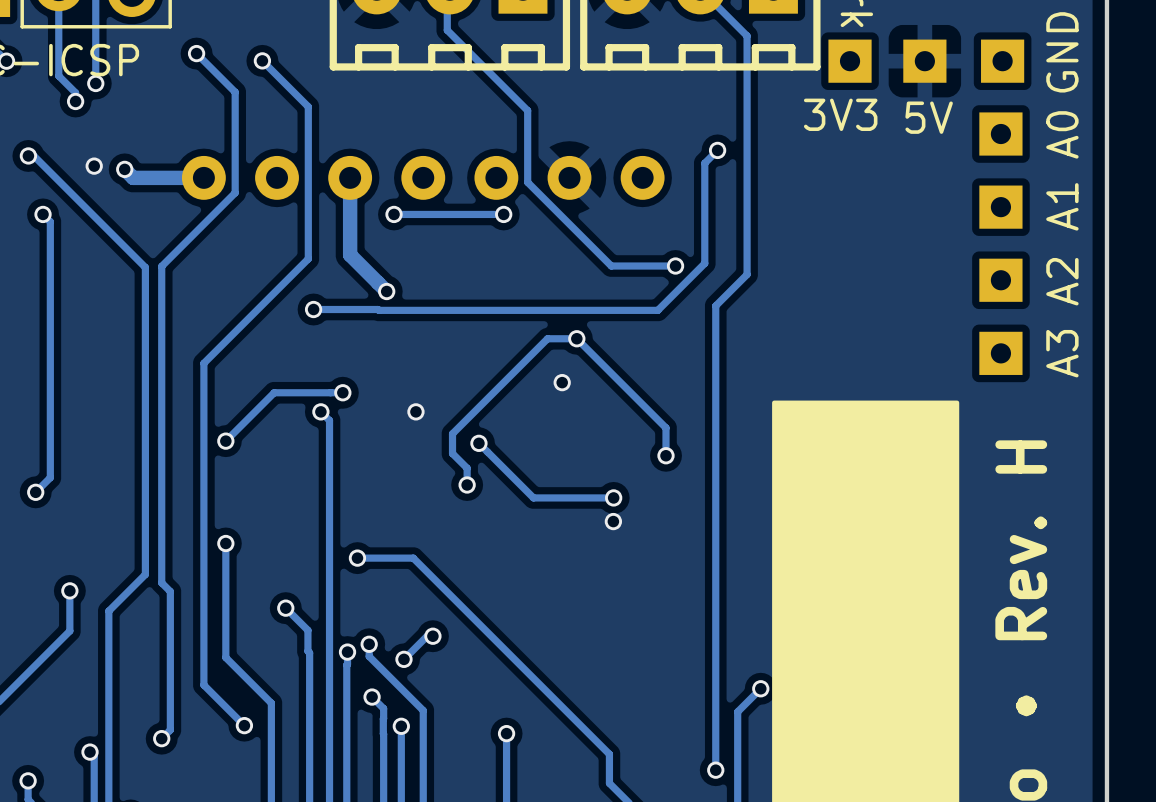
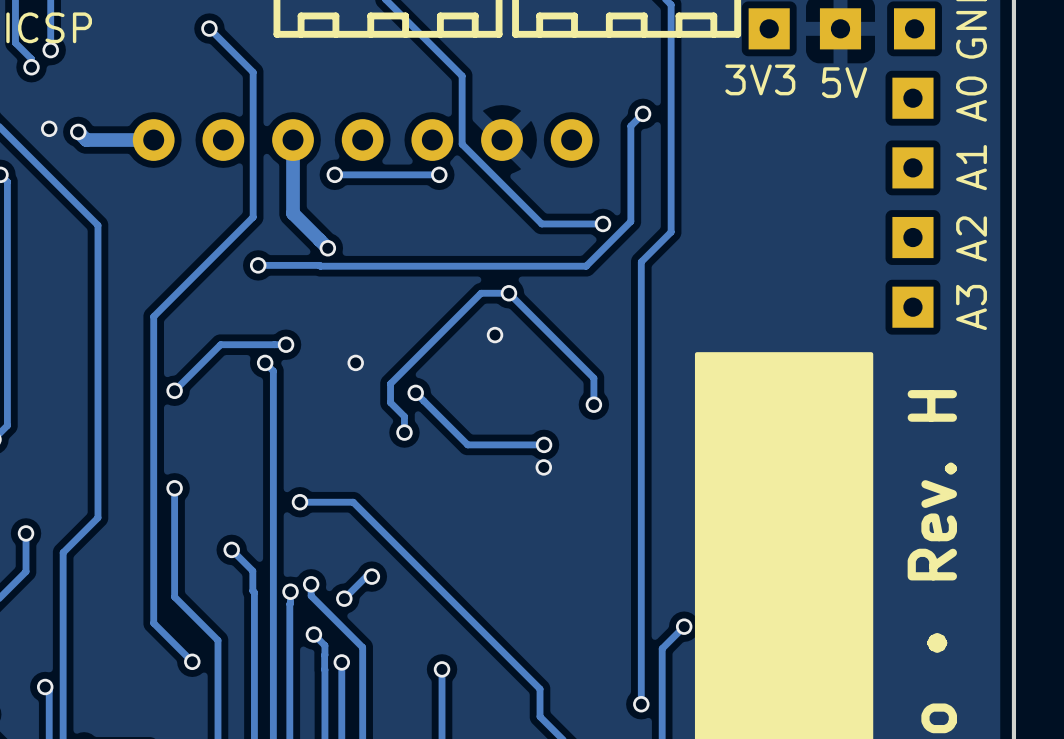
track: (196, 53) (235, 92) (235, 192) (161, 266) (161, 582) (170, 591) (170, 730) (161, 738) -> none
via: (196, 53) -> none
via: (161, 738) -> none

